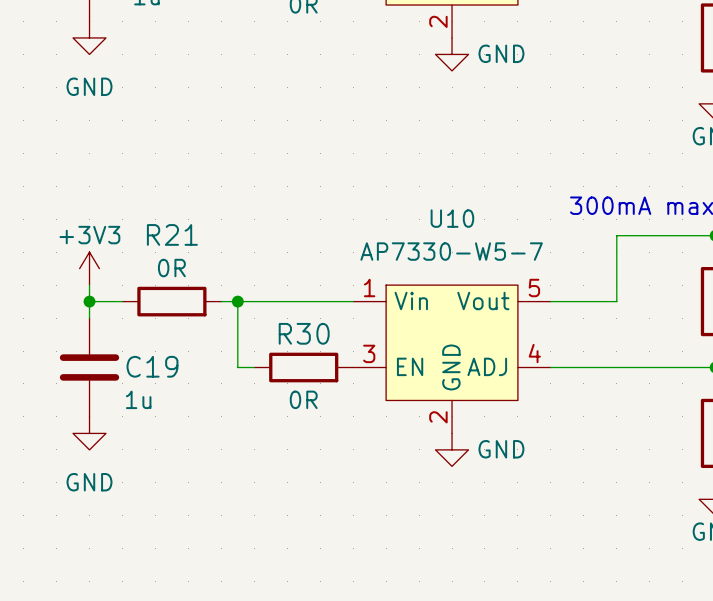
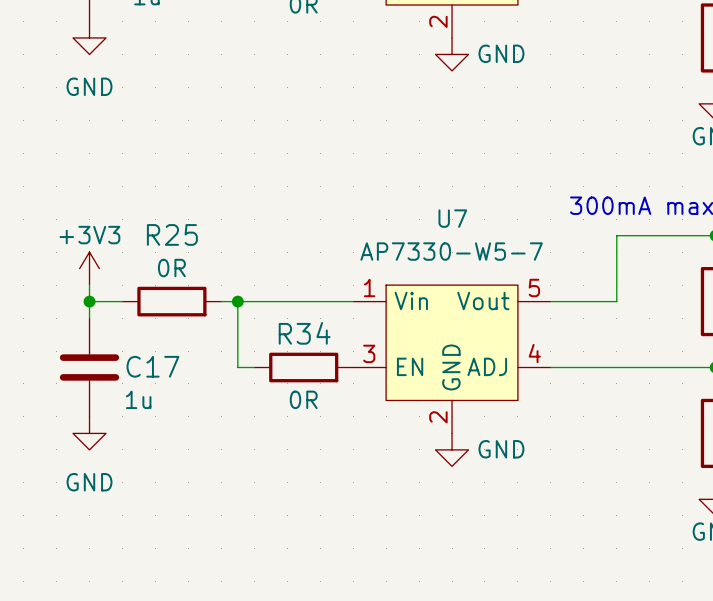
U10 name: U10 (452, 218) -> U7 (452, 218)
R21 name: R21 (172, 234) -> R25 (172, 234)
R30 name: R30 (304, 333) -> R34 (304, 333)
C19 name: C19 (152, 366) -> C17 (152, 366)

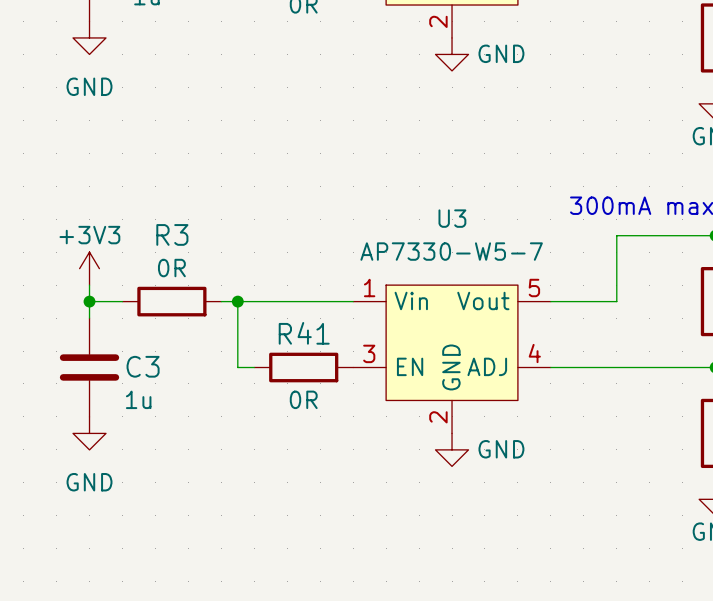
U7 name: U7 (452, 218) -> U3 (452, 218)
R25 name: R25 (172, 234) -> R3 (172, 234)
R34 name: R34 (304, 333) -> R41 (304, 333)
C17 name: C17 (152, 366) -> C3 (143, 366)

